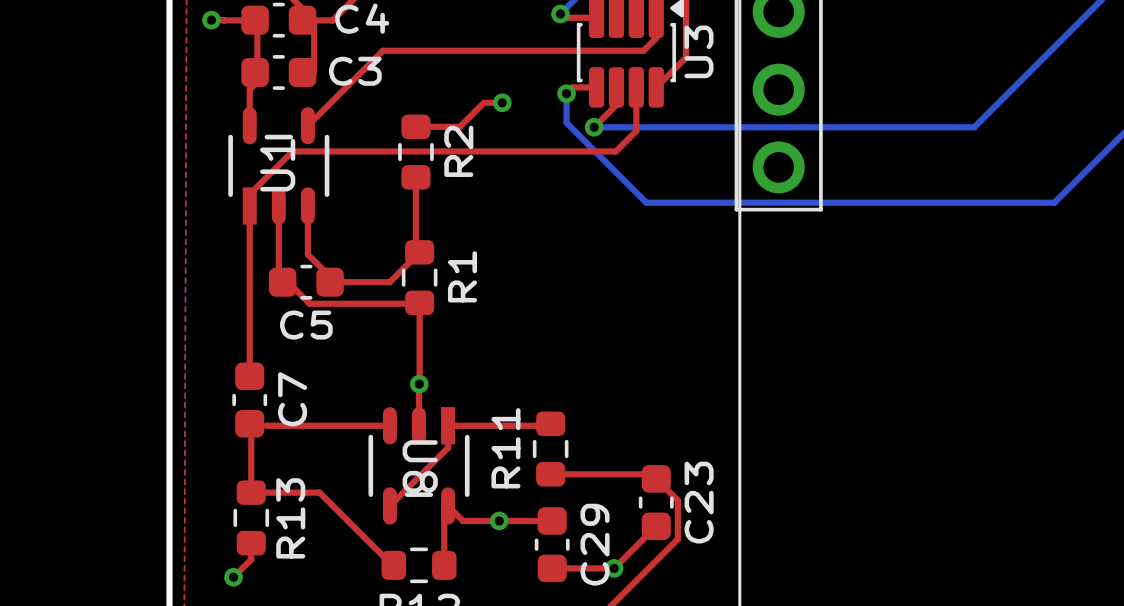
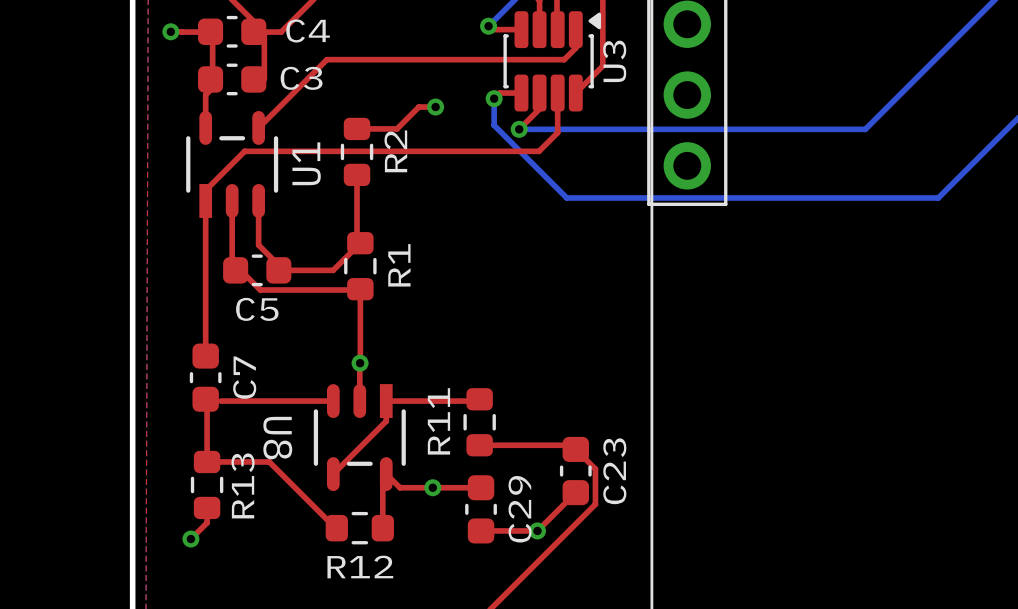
U1 name position: U1 (277, 165) -> U1 (306, 163)
U8 name position: U8 (420, 466) -> U8 (277, 438)

